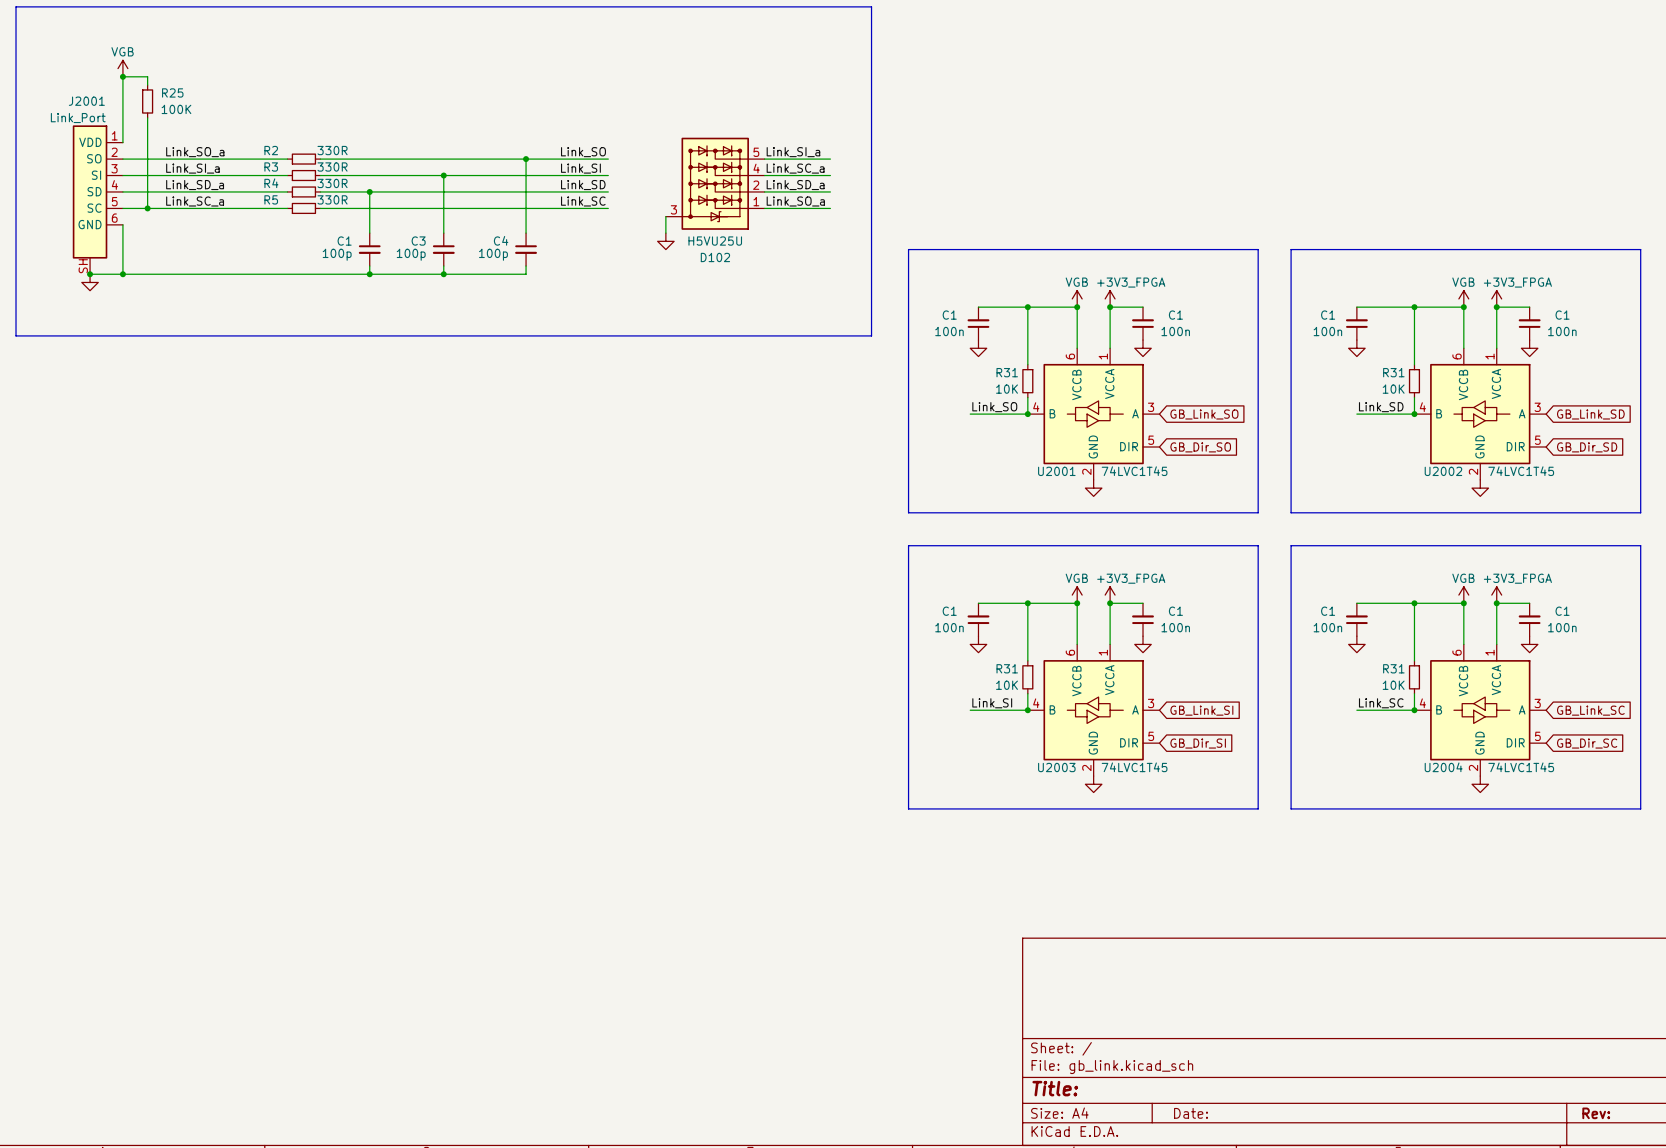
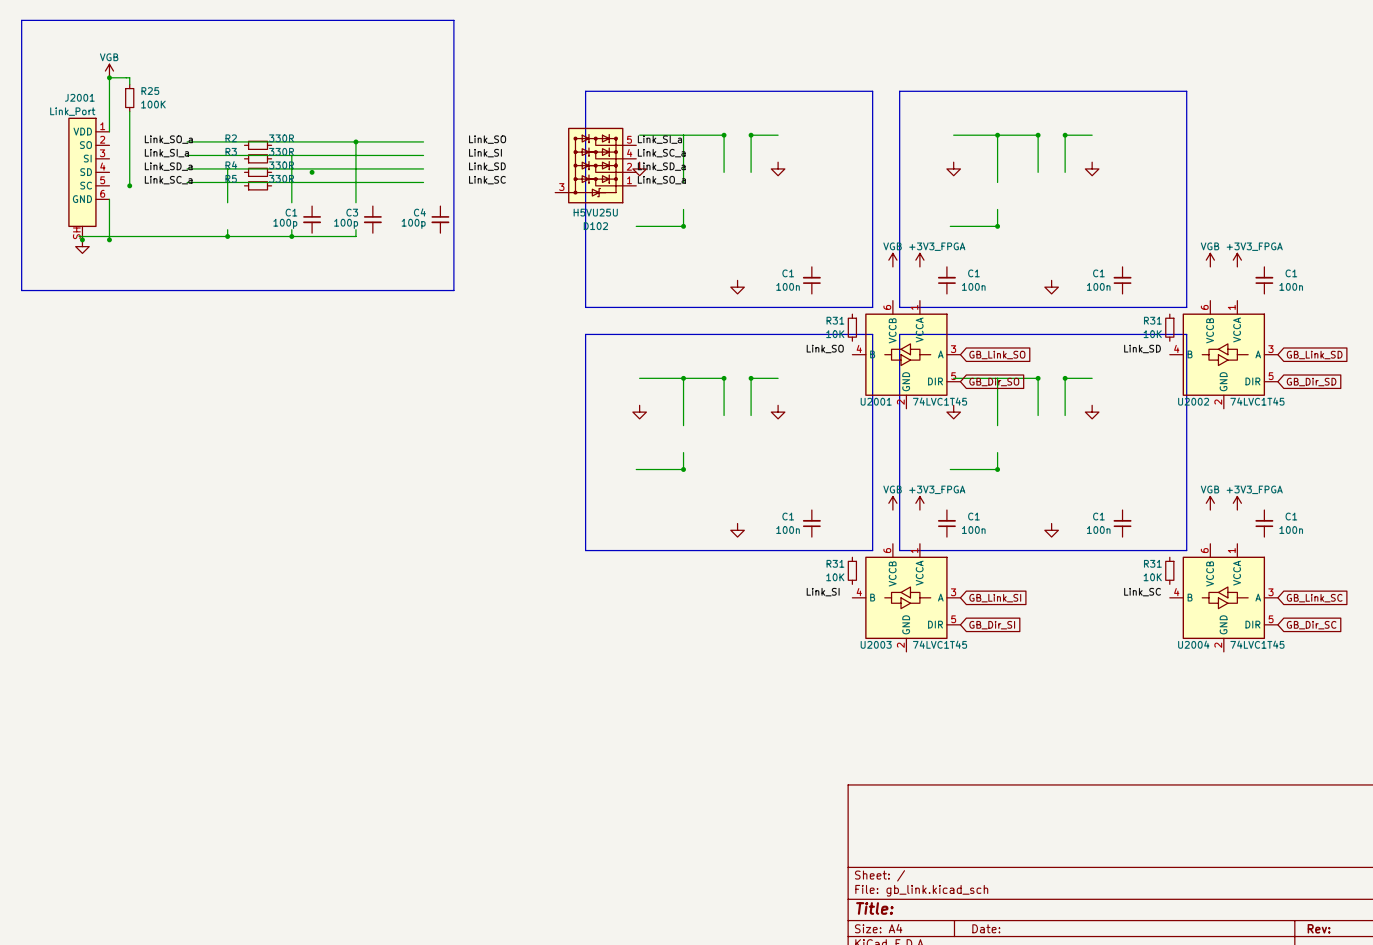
line: (542, 6) (871, 6) (871, 335) (542, 335) -> (453, 20) (453, 290)
line: none -> (585, 91) (872, 91) (872, 307) (585, 307) (585, 91)
line: none -> (899, 91) (1186, 91) (1186, 307) (899, 307) (899, 91)
wire: none -> (639, 135) (724, 135) (724, 172)
wire: none -> (683, 135) (683, 182)
junction: none -> (724, 135)
junction: none -> (751, 135)
wire: none -> (778, 135) (751, 135) (751, 172)
wire: none -> (953, 135) (1038, 135) (1038, 172)
wire: none -> (997, 135) (997, 182)
junction: none -> (997, 135)
junction: none -> (1038, 135)
junction: none -> (1065, 135)
wire: none -> (1092, 135) (1065, 135) (1065, 172)
wire: (122, 159) (287, 159) -> none
wire: (320, 159) (608, 159) -> (187, 141) (423, 141)
wire: (526, 159) (526, 233) -> (355, 141) (355, 202)
junction: (526, 159) -> none
wire: (764, 159) (830, 159) -> none
wire: (122, 175) (287, 175) -> none
wire: (320, 175) (608, 175) -> (187, 155) (423, 155)
wire: (443, 175) (443, 233) -> (291, 155) (291, 202)
junction position: (443, 175) -> (355, 141)
wire: (764, 175) (830, 175) -> none
power symbol: none -> (778, 168)
power symbol: none -> (953, 168)
power symbol: none -> (1092, 168)
wire: (122, 191) (287, 191) -> none
wire: (320, 191) (608, 191) -> (187, 168) (423, 168)
wire: (369, 191) (369, 233) -> (227, 168) (227, 202)
wire: (764, 191) (830, 191) -> none
wire: (122, 208) (287, 208) -> none
wire: (320, 208) (608, 208) -> (187, 182) (423, 182)
wire: (764, 208) (830, 208) -> none
wire: (665, 216) (665, 233) -> none
wire: none -> (683, 209) (683, 226) (636, 226)
wire: none -> (997, 209) (997, 226) (950, 226)
power symbol position: (665, 241) -> (639, 168)
line: (908, 249) (1258, 249) (1258, 512) (908, 512) (908, 249) -> none
line: (1291, 249) (1640, 249) (1640, 512) (1291, 512) (1291, 249) -> none
junction: none -> (683, 226)
junction: none -> (997, 226)
wire: none -> (355, 229) (355, 236) (79, 236)
wire: (369, 266) (369, 274) -> (227, 229) (227, 236)
wire: (443, 266) (443, 274) -> (291, 229) (291, 236)
wire: (526, 266) (526, 274) (90, 274) -> none
junction: none -> (227, 236)
junction position: (369, 274) -> (291, 236)
junction: (443, 274) -> none
wire: (978, 307) (1077, 307) (1077, 348) -> none
wire: (1027, 307) (1027, 364) -> none
junction: (1027, 307) -> none
junction: (1077, 307) -> none
junction: (1110, 307) -> none
wire: (1143, 307) (1110, 307) (1110, 348) -> none
wire: (1356, 307) (1463, 307) (1463, 348) -> none
wire: (1414, 307) (1414, 364) -> none
junction: (1414, 307) -> none
junction: (1463, 307) -> none
junction: (1496, 307) -> none
wire: (1529, 307) (1496, 307) (1496, 348) -> none
power symbol: none -> (737, 287)
power symbol: none -> (1051, 287)
power symbol: (978, 348) -> none
power symbol: (1143, 348) -> none
power symbol: (1356, 348) -> none
power symbol: (1529, 348) -> none
line: none -> (585, 334) (872, 334) (872, 550) (585, 550) (585, 334)
line: none -> (899, 334) (899, 550) (1186, 550) (1186, 334) (899, 334)
wire: (1027, 397) (1027, 414) (970, 414) -> none
wire: (1414, 397) (1414, 414) (1356, 414) -> none
junction: (1027, 414) -> none
junction: (1414, 414) -> none
wire: none -> (639, 378) (724, 378) (724, 415)
wire: none -> (683, 378) (683, 425)
junction: none -> (683, 378)
junction: none -> (724, 378)
junction: none -> (751, 378)
wire: none -> (778, 378) (751, 378) (751, 415)
wire: none -> (953, 378) (1038, 378) (1038, 415)
wire: none -> (997, 378) (997, 425)
junction: none -> (1038, 378)
junction: none -> (1065, 378)
wire: none -> (1092, 378) (1065, 378) (1065, 415)
power symbol: none -> (639, 412)
power symbol: none -> (778, 412)
power symbol: none -> (1092, 412)
power symbol position: (1093, 488) -> (953, 412)
power symbol: (1480, 488) -> none
wire: none -> (683, 452) (683, 469) (636, 469)
wire: none -> (997, 452) (997, 469) (950, 469)
line: (908, 545) (1258, 545) (1258, 808) (908, 808) (908, 545) -> none
line: (1291, 545) (1291, 808) (1640, 808) (1640, 545) (1291, 545) -> none
junction: none -> (683, 469)
junction: none -> (997, 469)
wire: (978, 603) (1077, 603) (1077, 644) -> none
wire: (1027, 603) (1027, 660) -> none
junction: (1027, 603) -> none
junction: (1077, 603) -> none
junction: (1110, 603) -> none
wire: (1143, 603) (1110, 603) (1110, 644) -> none
wire: (1356, 603) (1463, 603) (1463, 644) -> none
wire: (1414, 603) (1414, 660) -> none
junction: (1414, 603) -> none
junction: (1463, 603) -> none
junction: (1496, 603) -> none
wire: (1529, 603) (1496, 603) (1496, 644) -> none
power symbol: none -> (737, 530)
power symbol: none -> (1051, 530)
power symbol: (978, 644) -> none
power symbol: (1143, 644) -> none
power symbol: (1356, 644) -> none
power symbol: (1529, 644) -> none
wire: (1027, 693) (1027, 710) (970, 710) -> none
wire: (1414, 693) (1414, 710) (1356, 710) -> none
junction: (1027, 710) -> none
junction: (1414, 710) -> none
power symbol: (1093, 784) -> none
power symbol: (1480, 784) -> none

